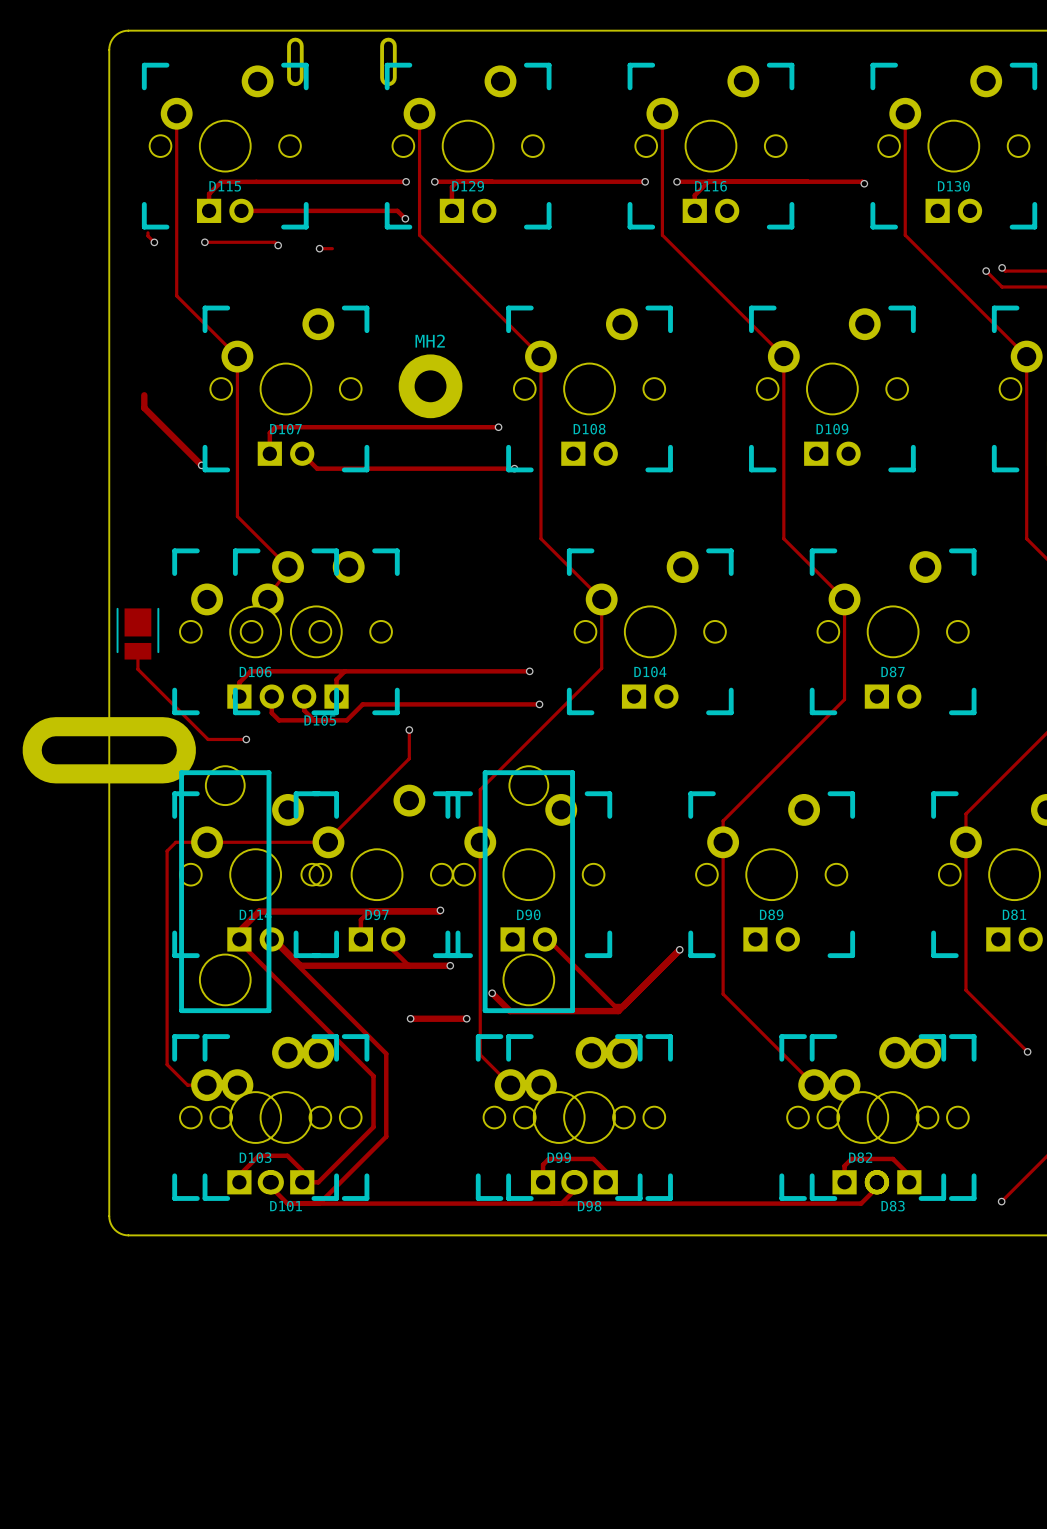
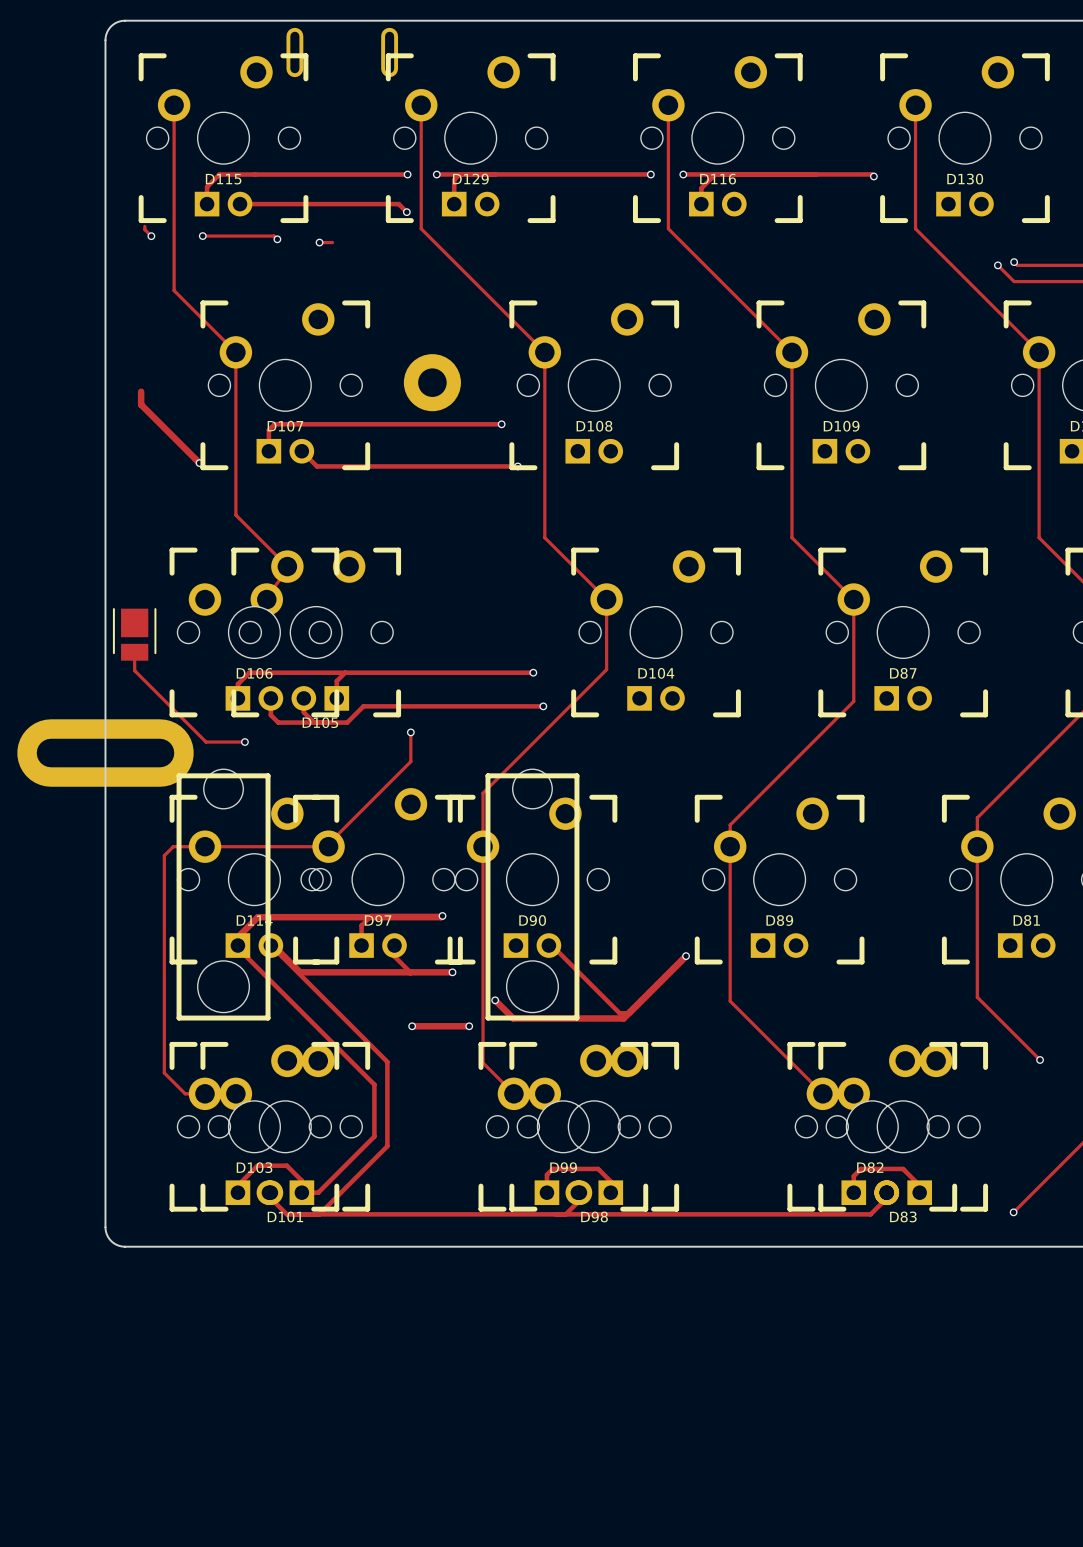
MH2: (430, 386) -> none
part: none -> (432, 382)

